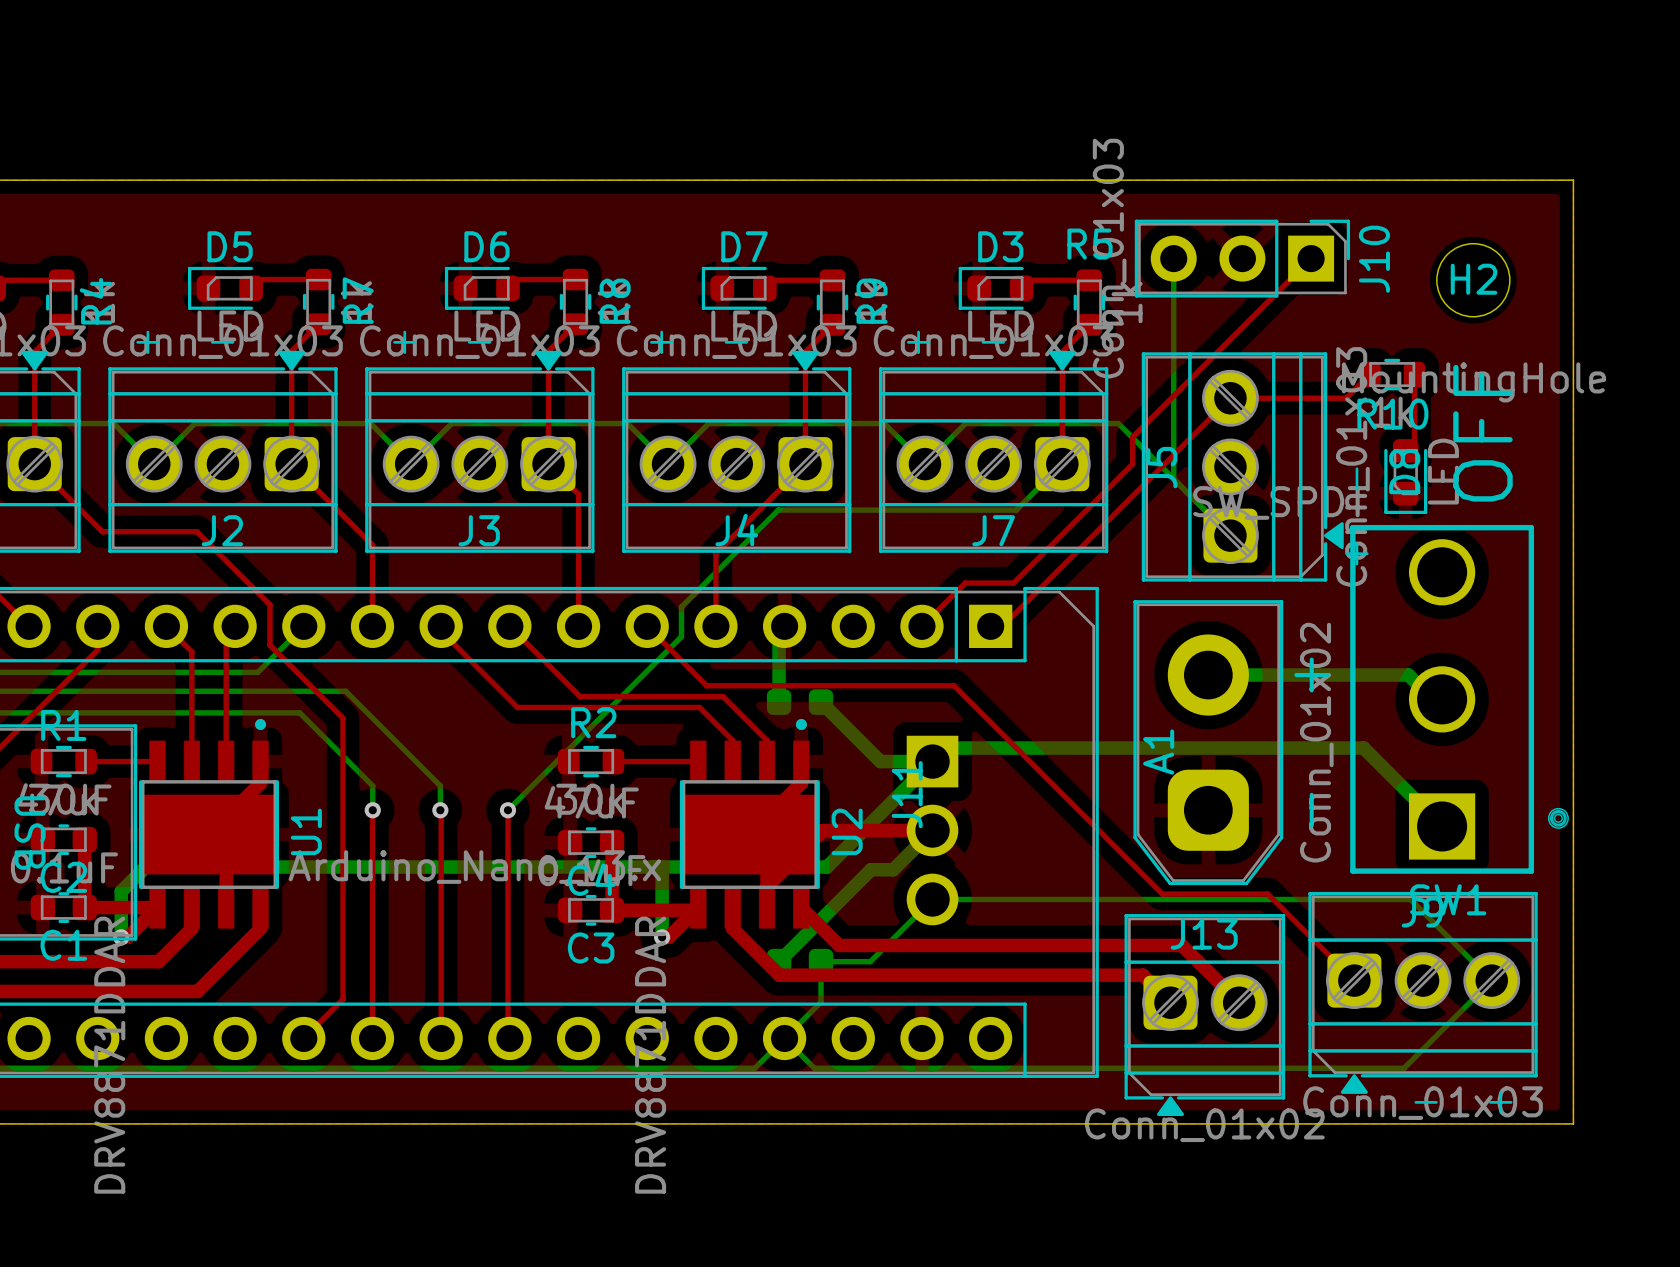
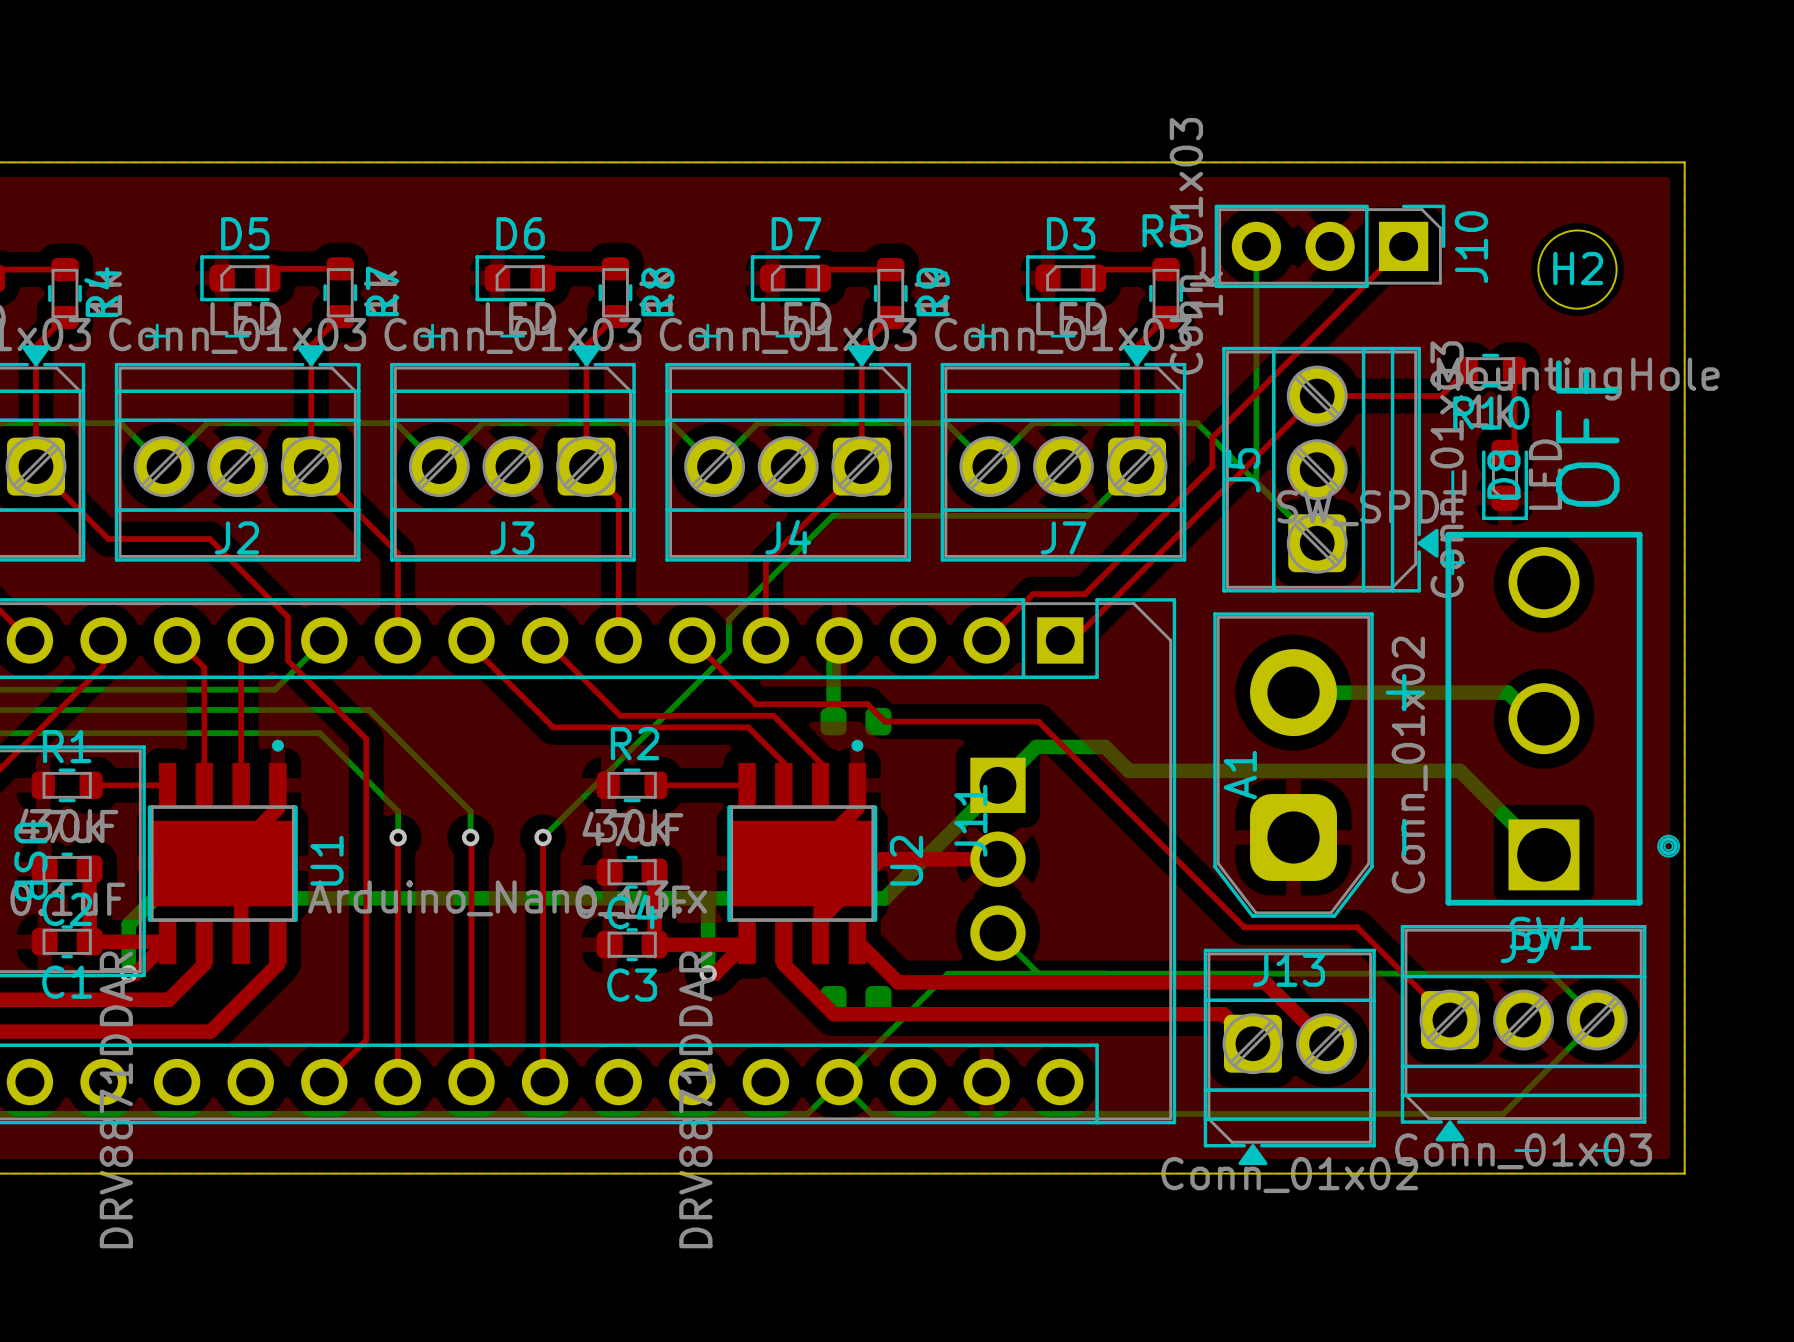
top track: (810, 685) (954, 685) (970, 702) -> (867, 704) (884, 721) (1038, 721)
bottom track: (820, 702) (880, 761) (932, 761) -> none
bottom track: (946, 748) (1054, 748) -> (1012, 770) (1036, 746) (1105, 746) (1129, 770)
bottom track: (932, 830) (893, 869) (871, 869) (779, 961) (775, 958) -> none
bottom track: none -> (997, 933) (1038, 973)
bottom track: (1448, 937) (1410, 899) (932, 899) (870, 961) (820, 961) (820, 1002) -> (1550, 973) (947, 973) (878, 1043)

